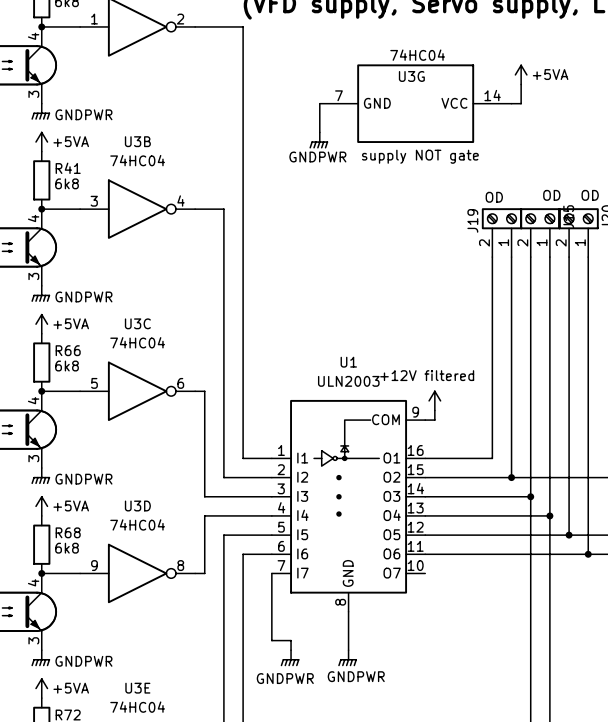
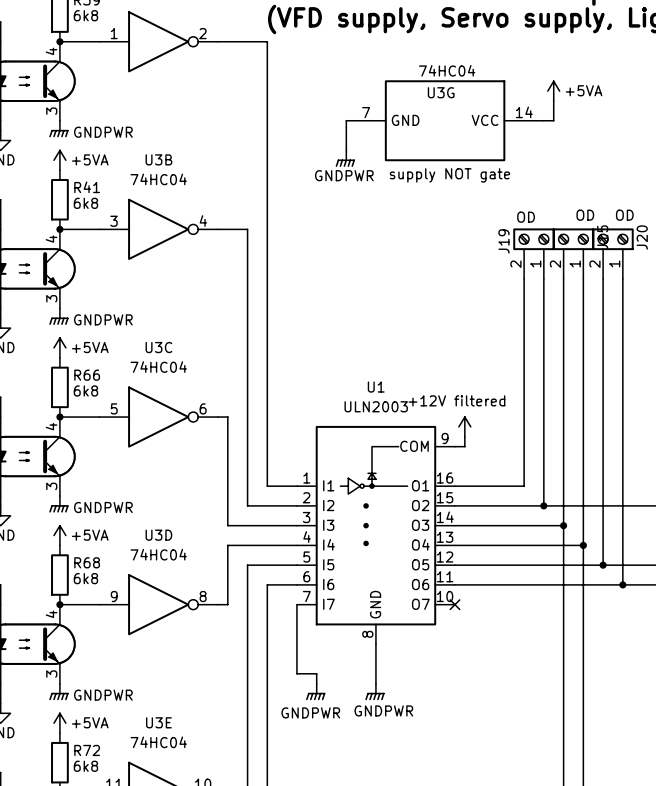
no-connect mark: none -> (454, 604)

